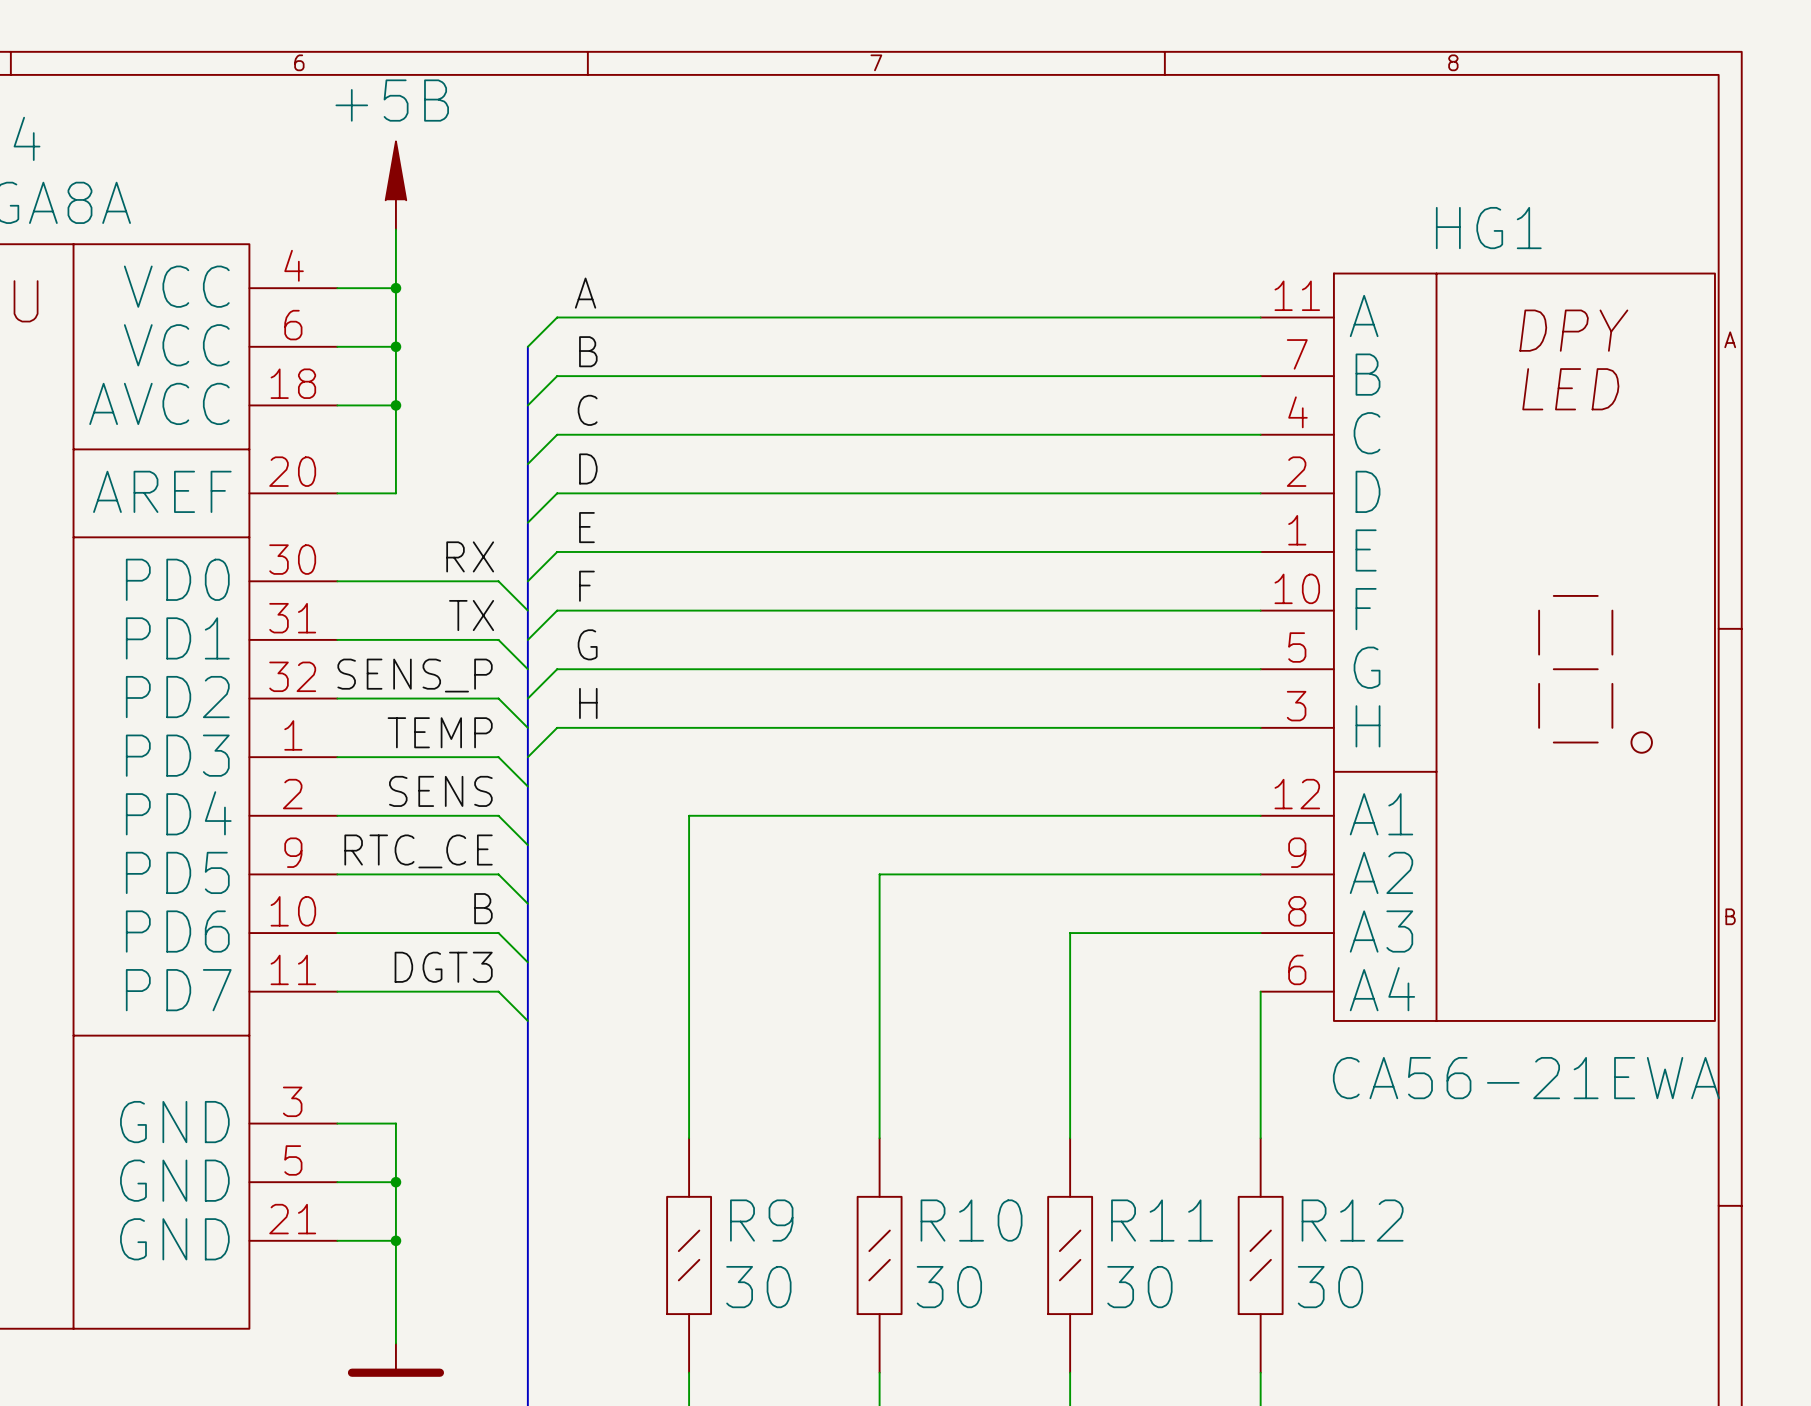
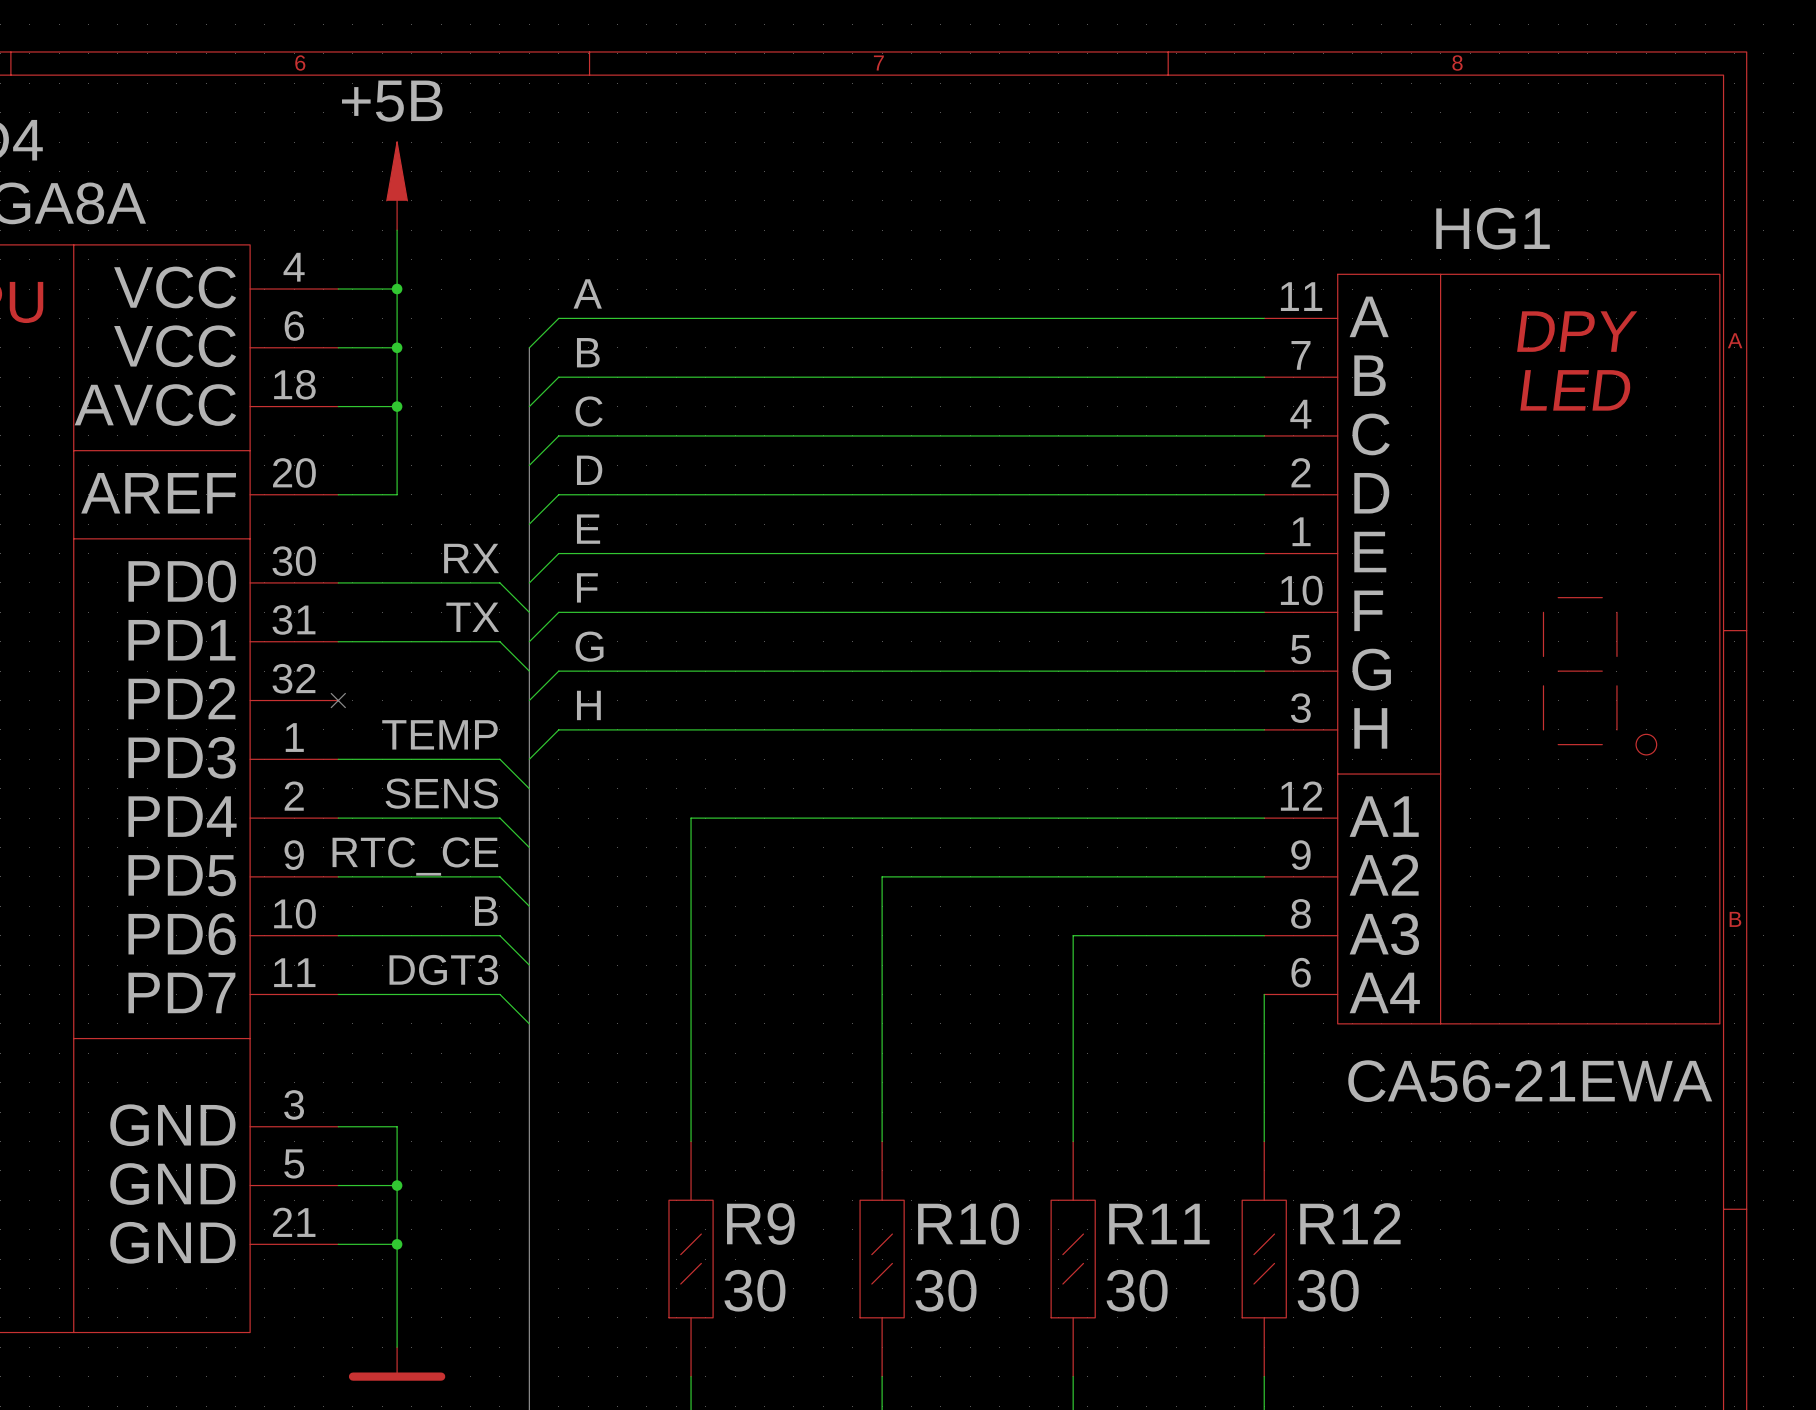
label: SENS_P (415, 675) -> none
wire: (337, 698) (498, 698) (527, 727) -> none
no-connect mark: none -> (338, 700)

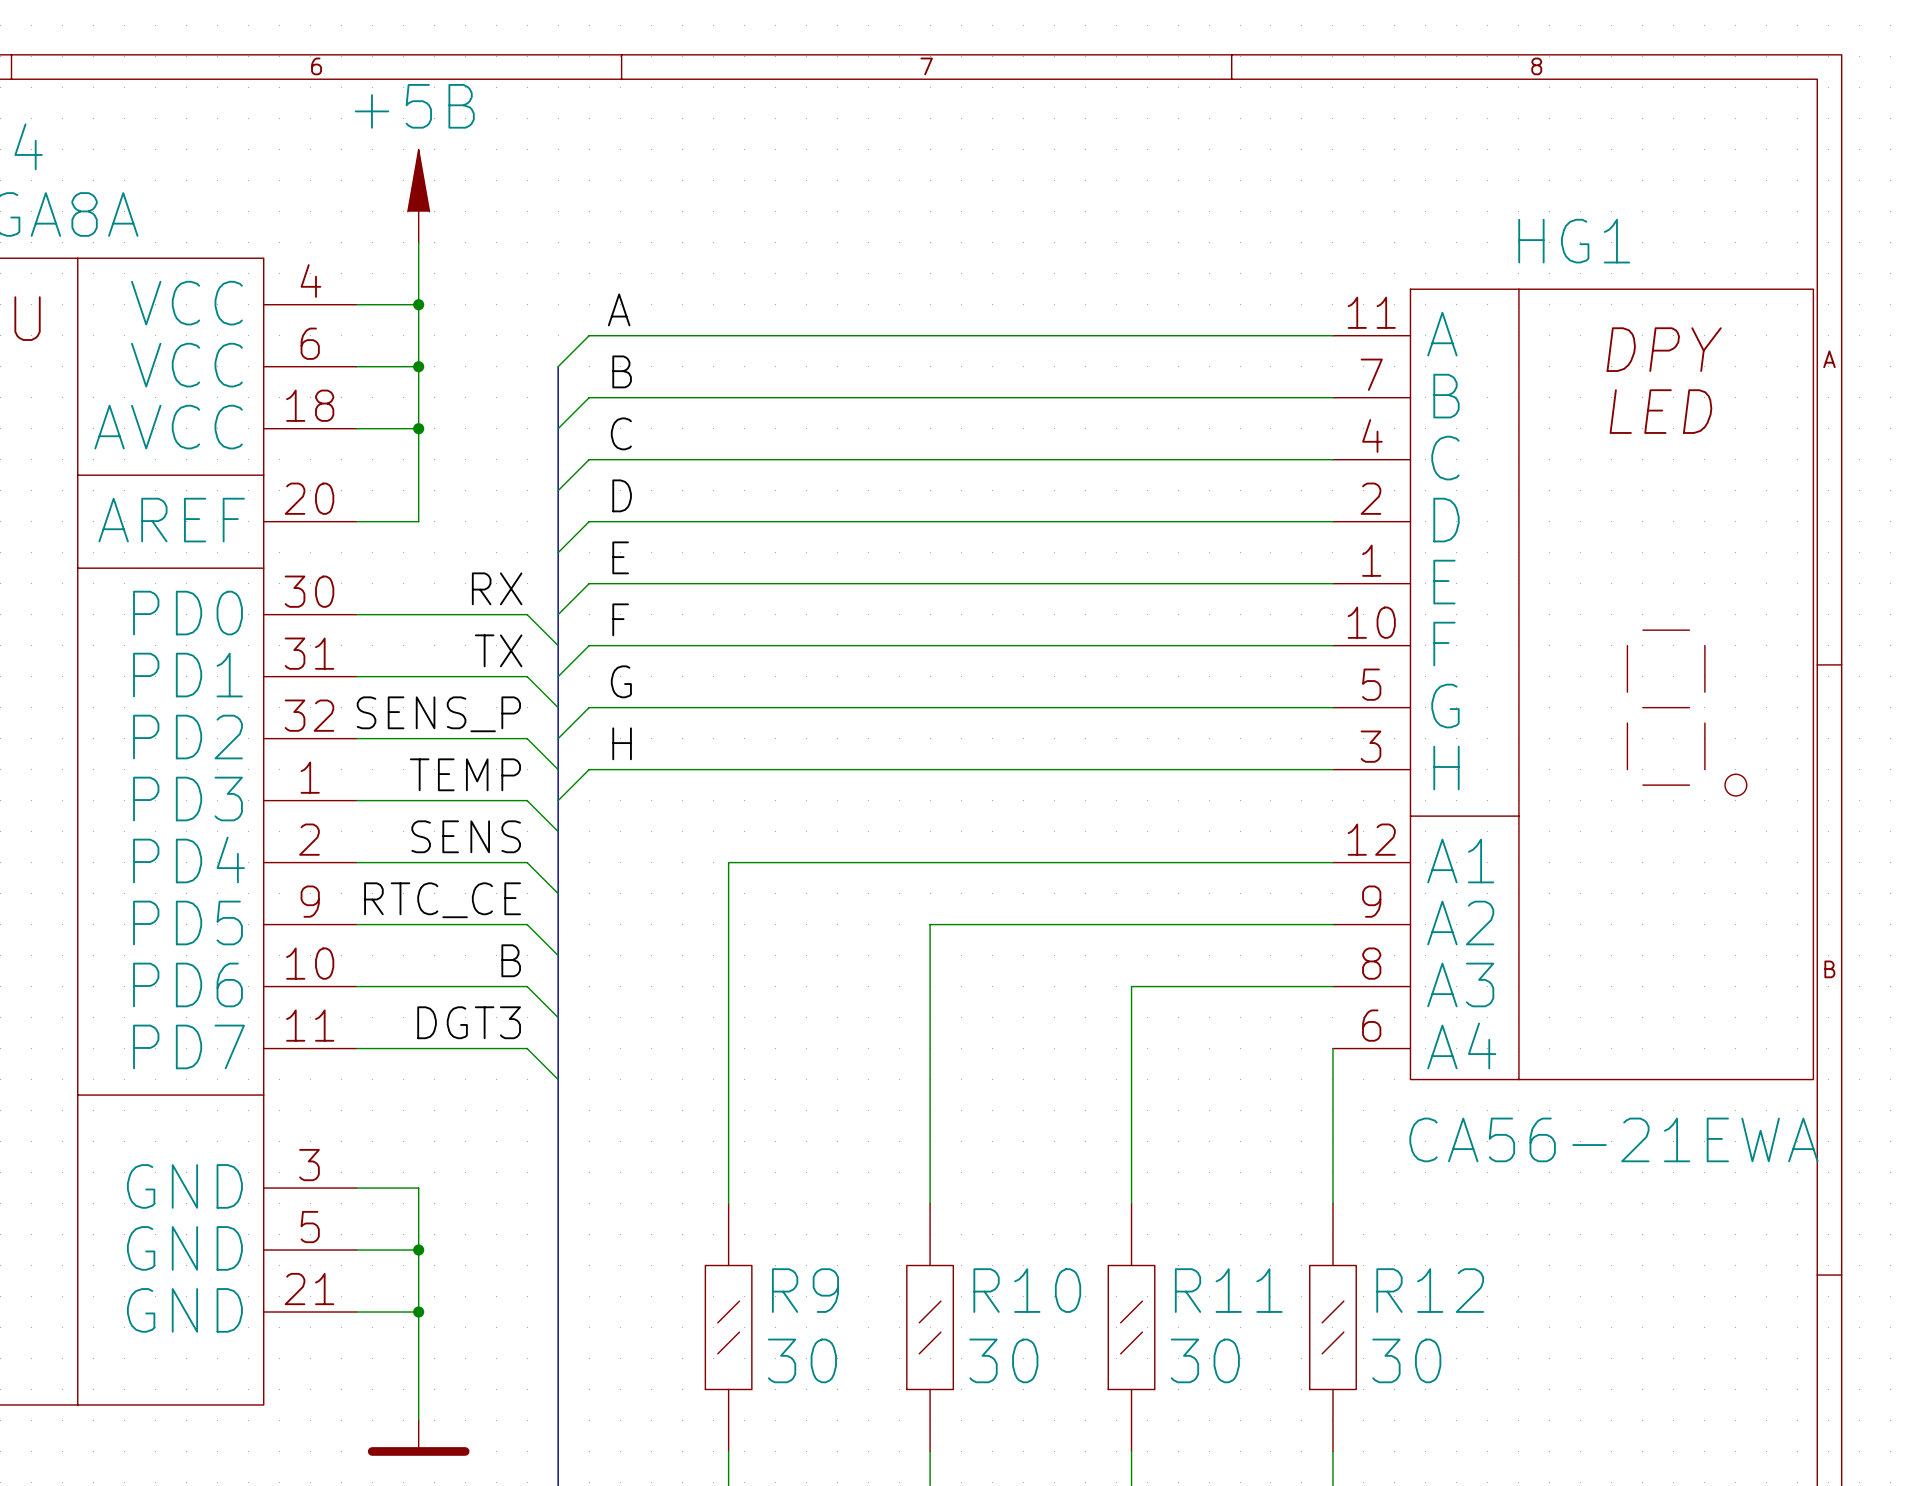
label: none -> SENS_P (438, 714)
wire: none -> (356, 738) (527, 738) (558, 769)
no-connect mark: (338, 700) -> none

